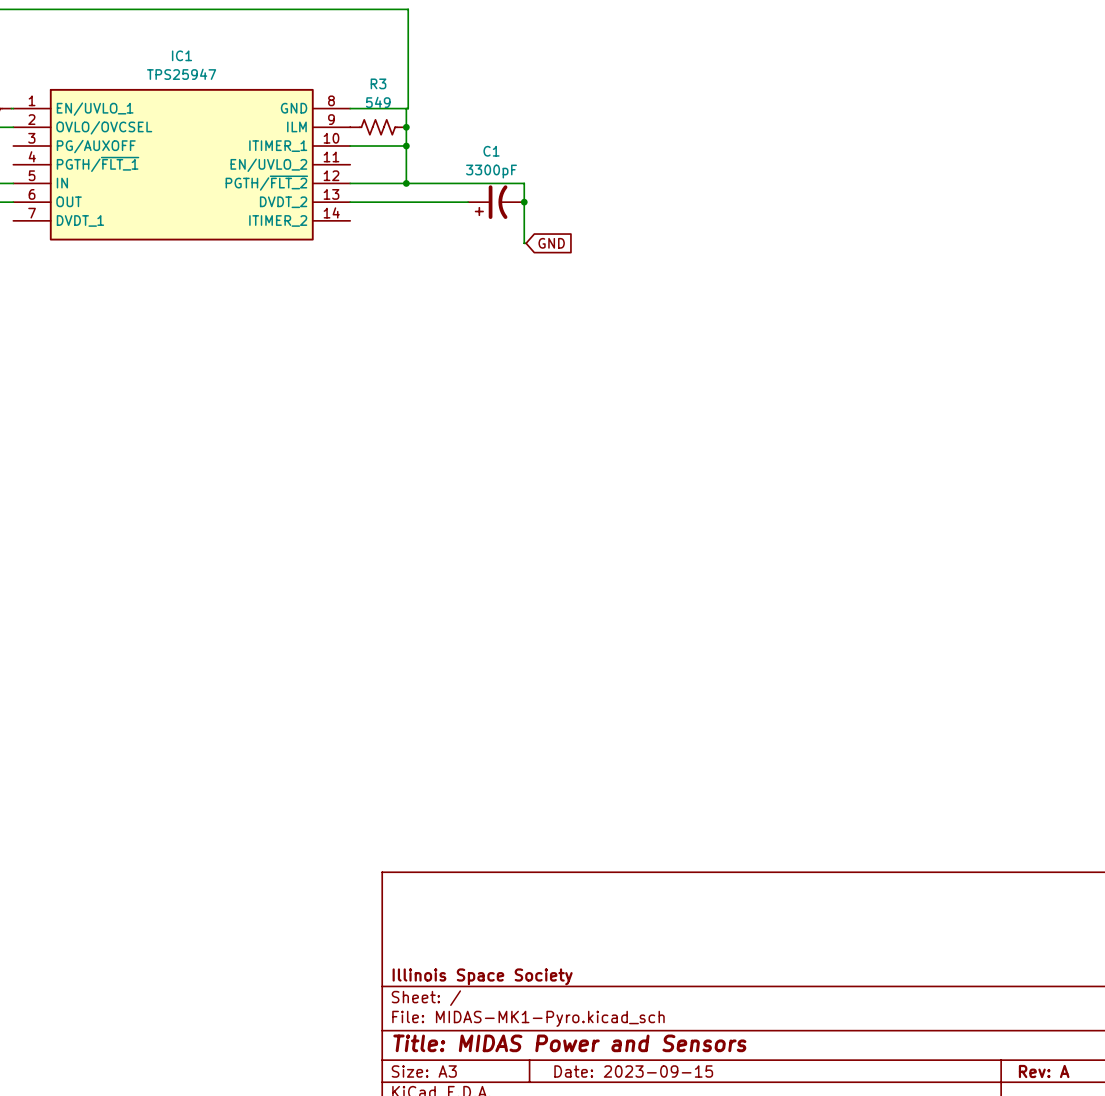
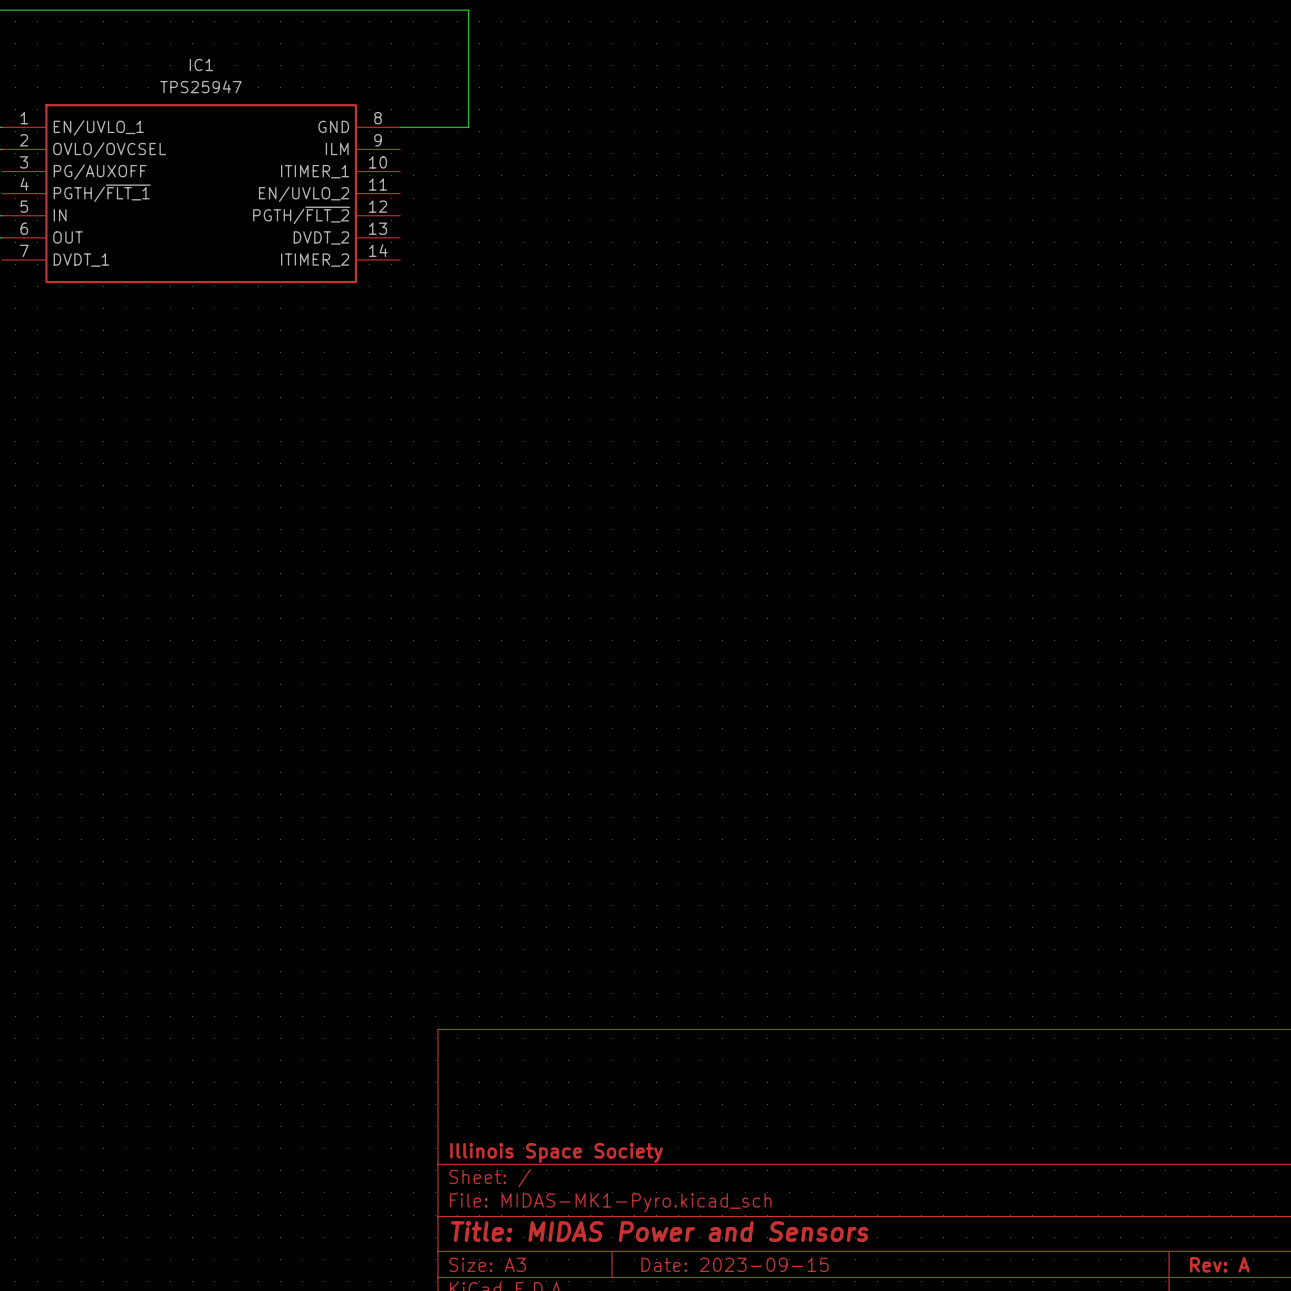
wire: (406, 108) (406, 183) -> none
R3: 549 (378, 127) -> none
junction: (406, 127) -> none
wire: (350, 146) (406, 146) -> none
junction: (406, 146) -> none
wire: (350, 183) (524, 183) (524, 243) (526, 243) -> none
junction: (406, 183) -> none
wire: (350, 202) (468, 202) -> none
C1: 3300pF (496, 202) -> none
junction: (524, 202) -> none
global label: GND (551, 243) -> none

